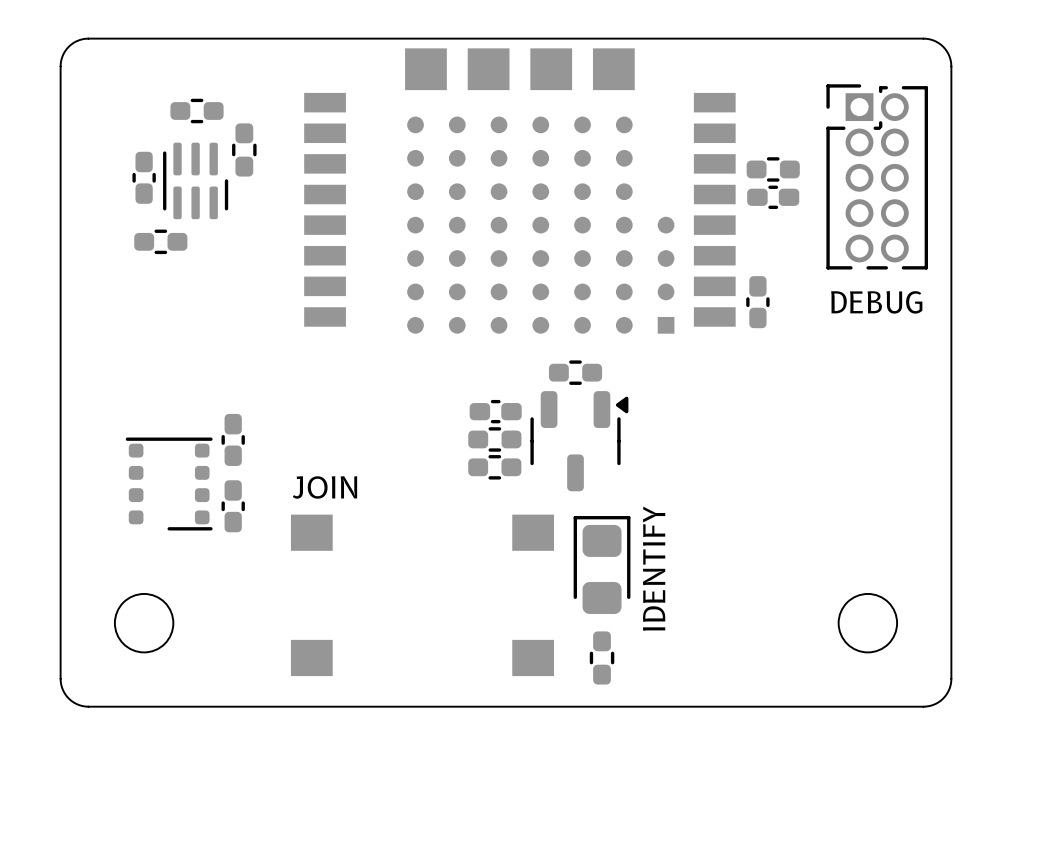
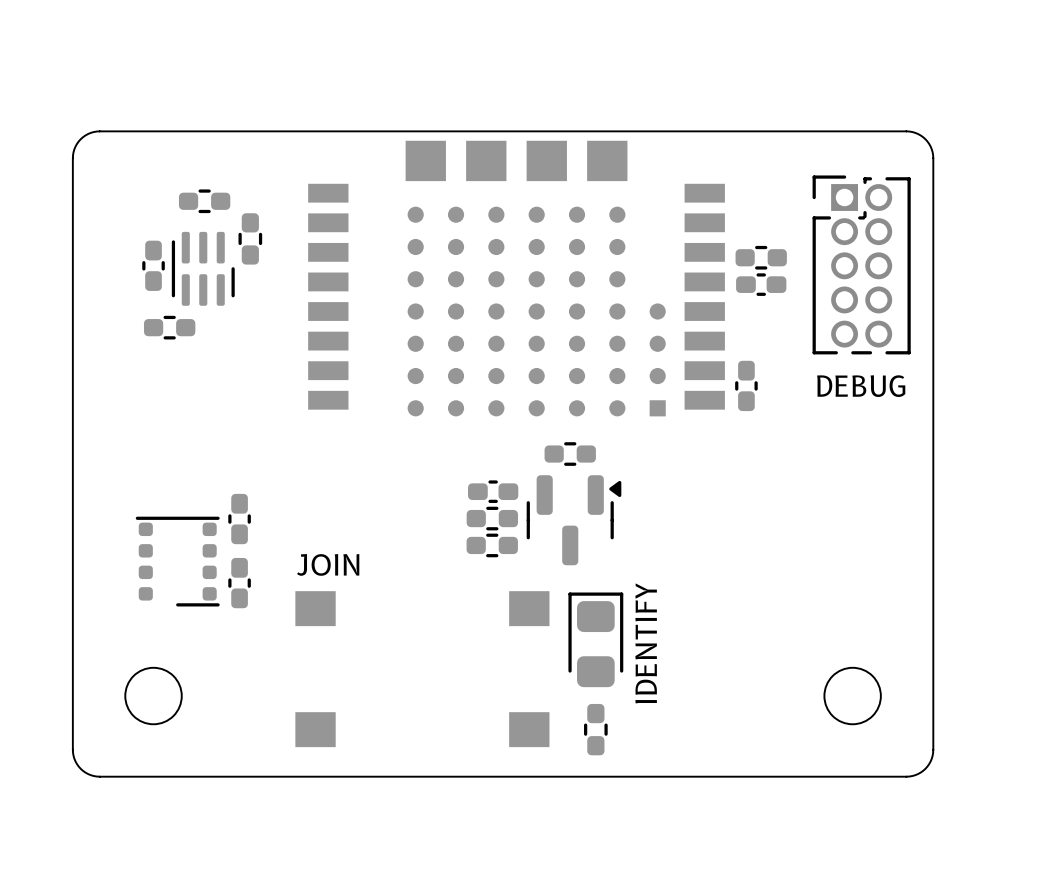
part footprint: [530, 391, 629, 492] -> [526, 475, 622, 566]

